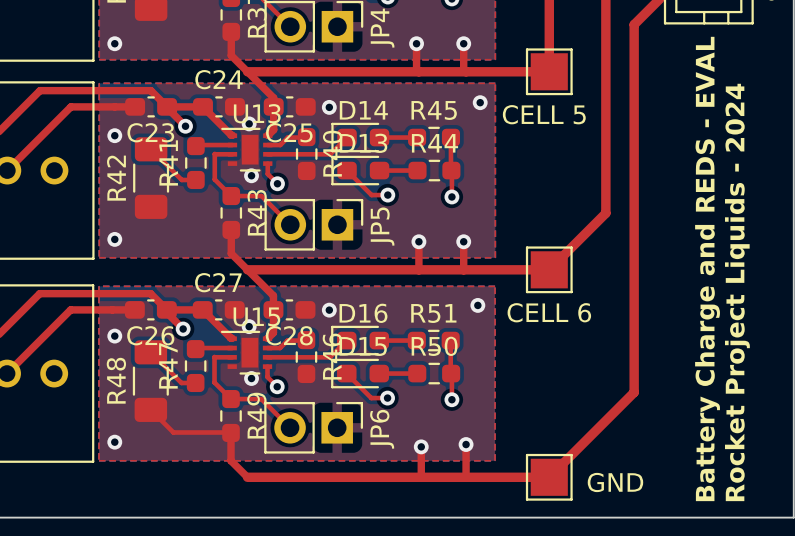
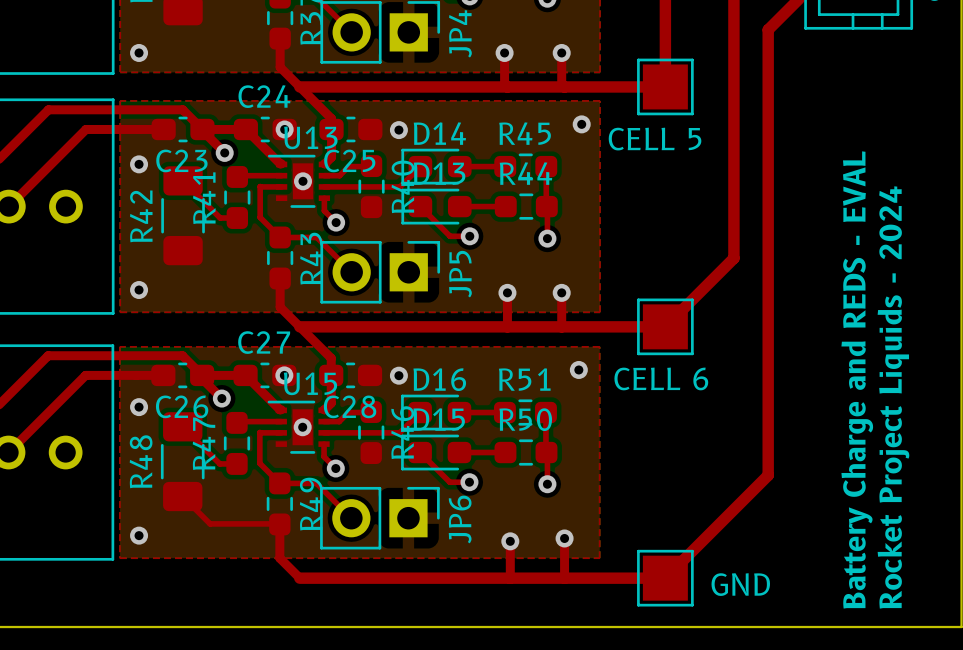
via: none -> (284, 129)
via: (249, 123) -> none
via: none -> (303, 181)
via: (251, 175) -> none
via: none -> (284, 375)
via: (249, 326) -> none
via: none -> (302, 427)
via: (251, 378) -> none

